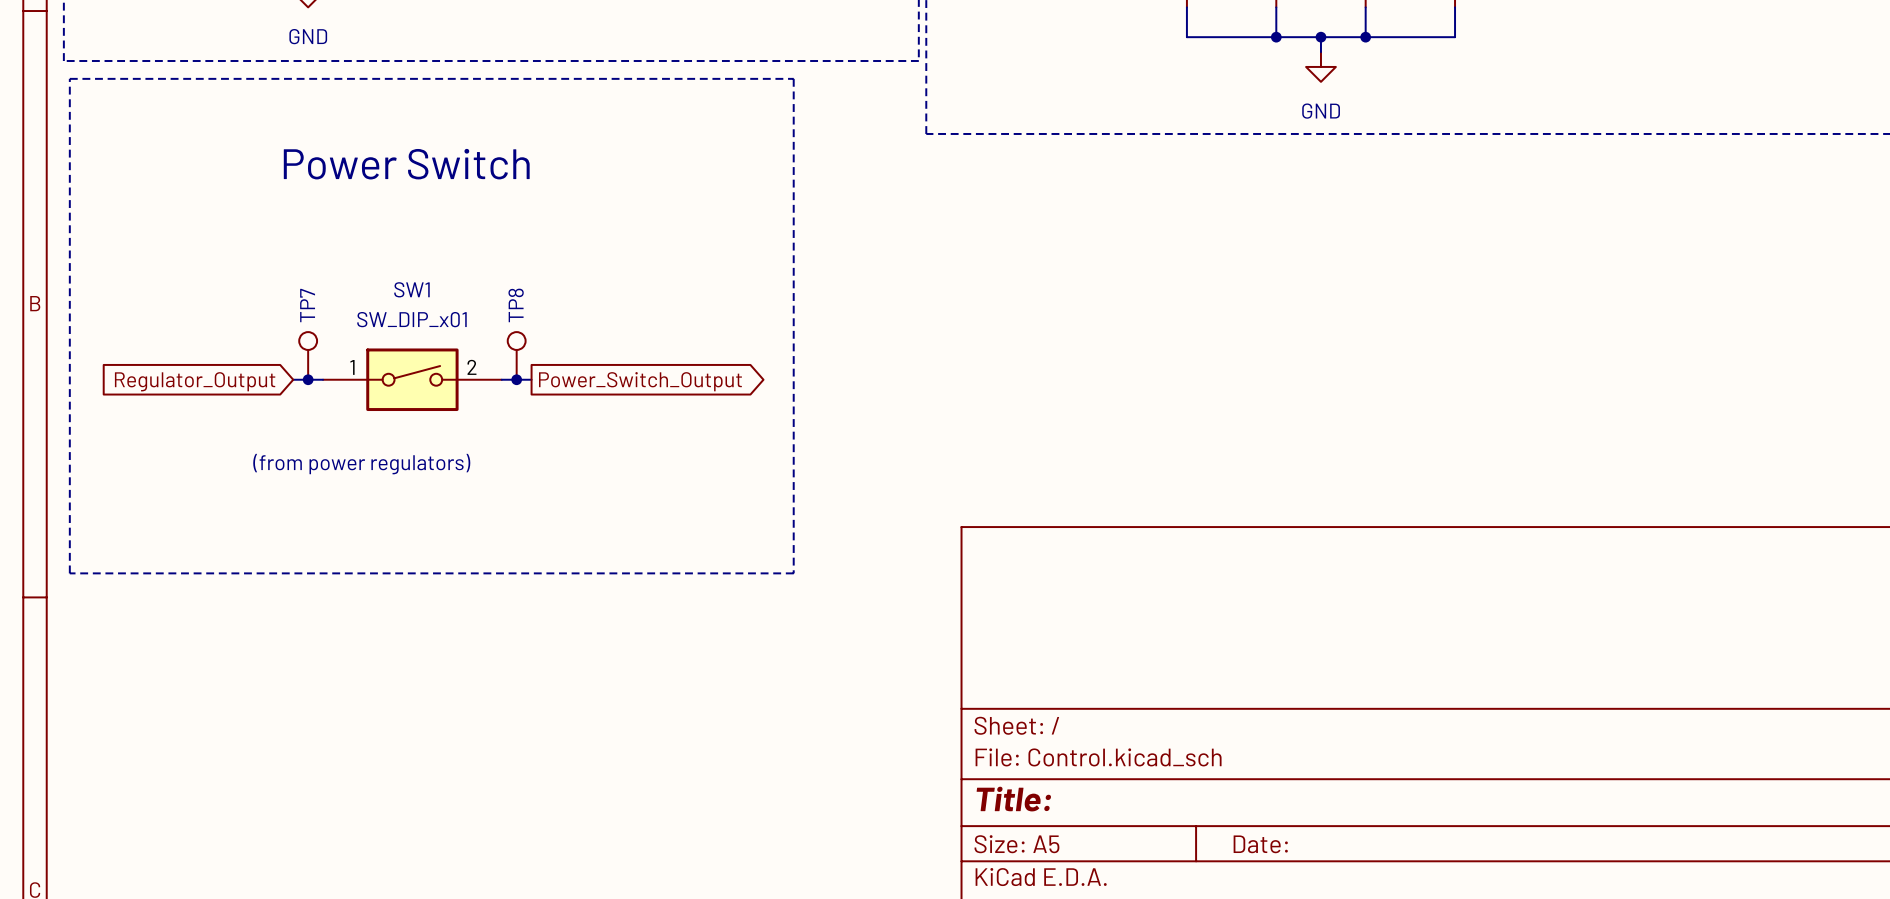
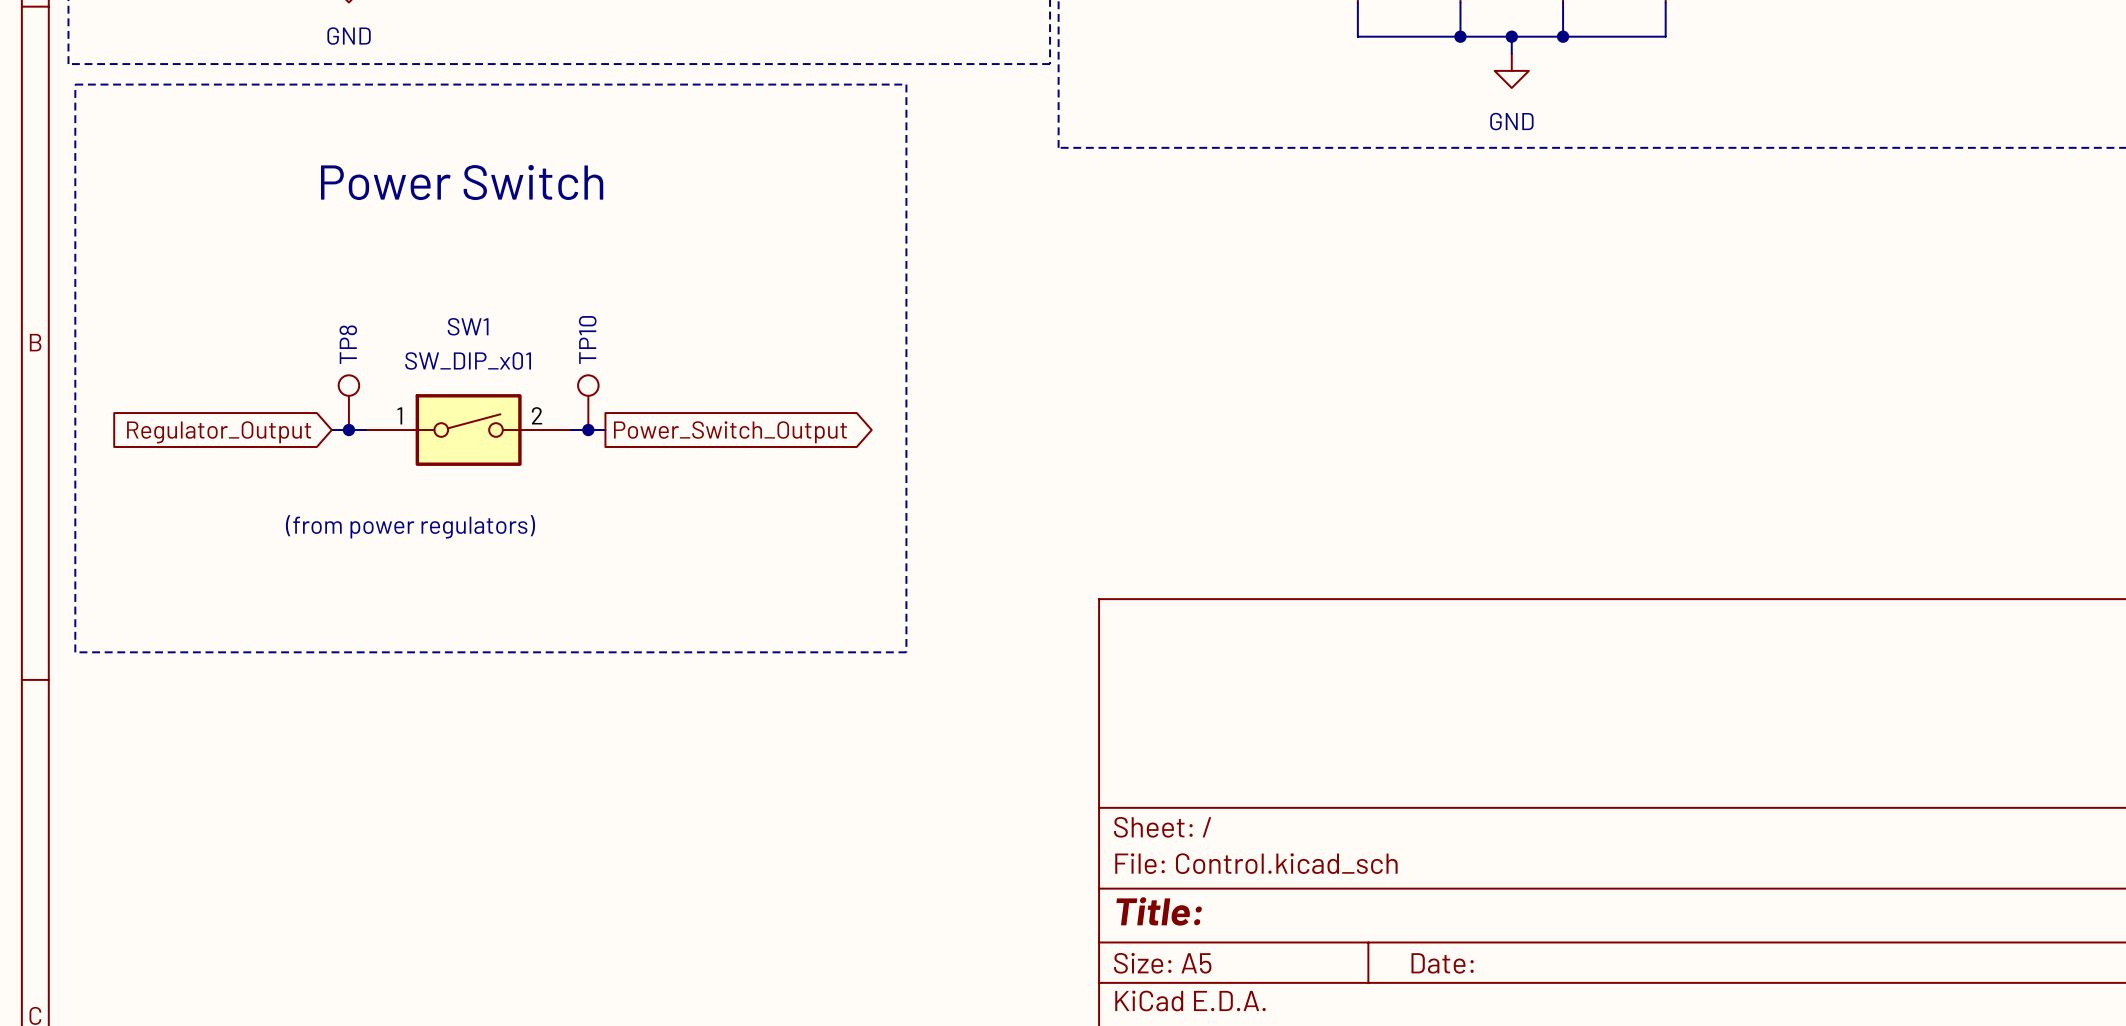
TP7 name: TP7 (307, 305) -> TP8 (348, 344)
TP8 name: TP8 (516, 305) -> TP10 (587, 340)

